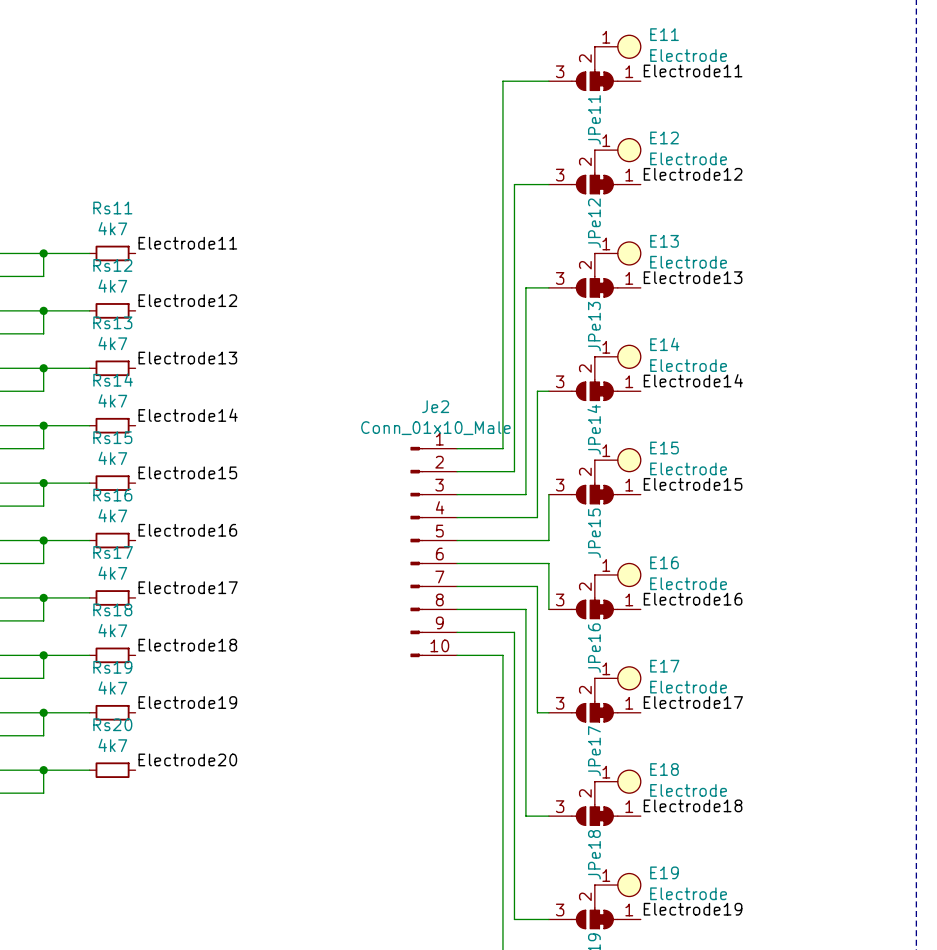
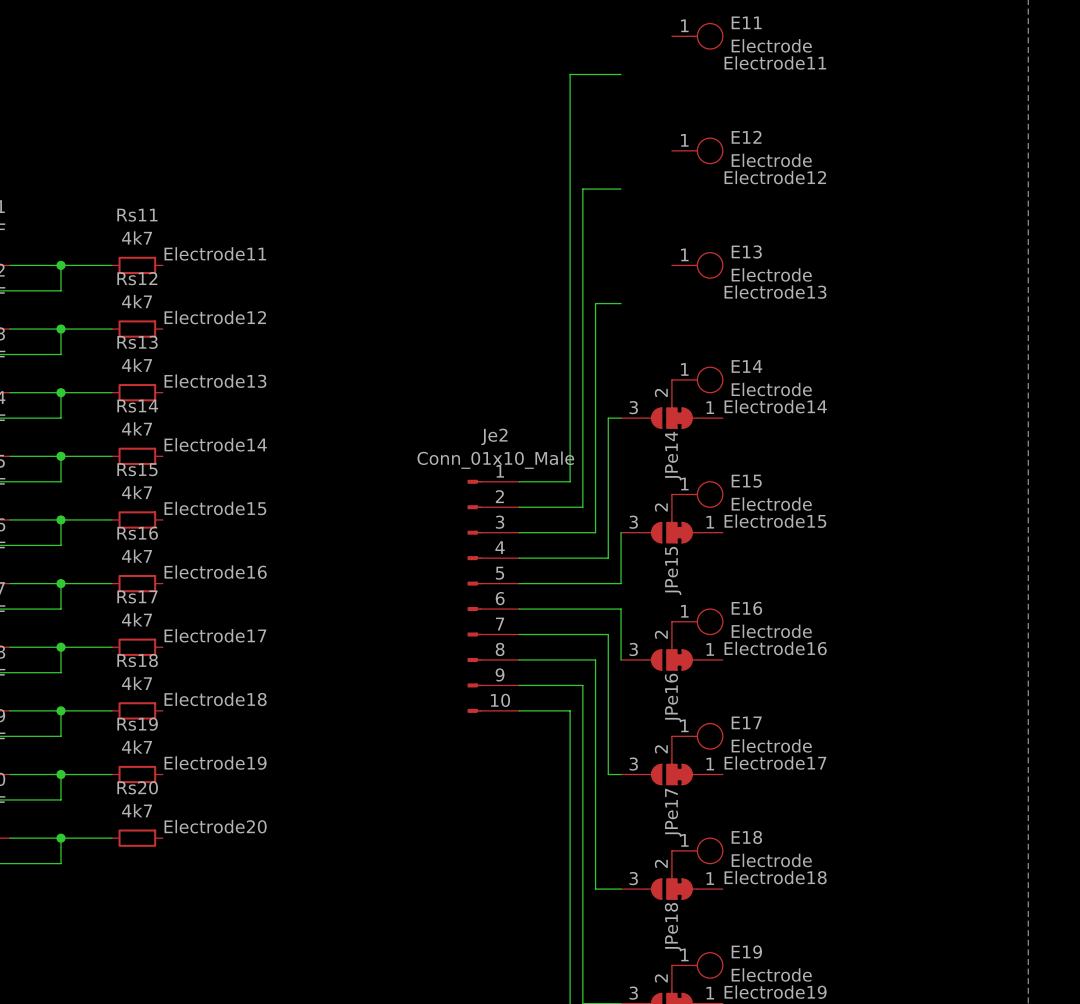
JPe11: (594, 68) -> none
JPe12: (594, 171) -> none
JPe13: (594, 275) -> none

